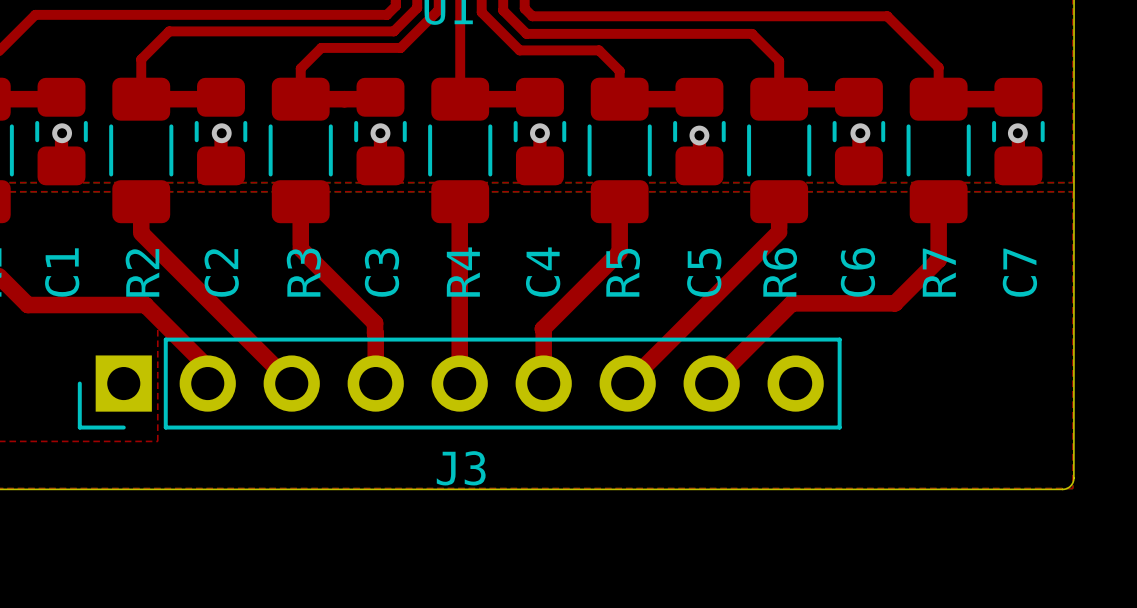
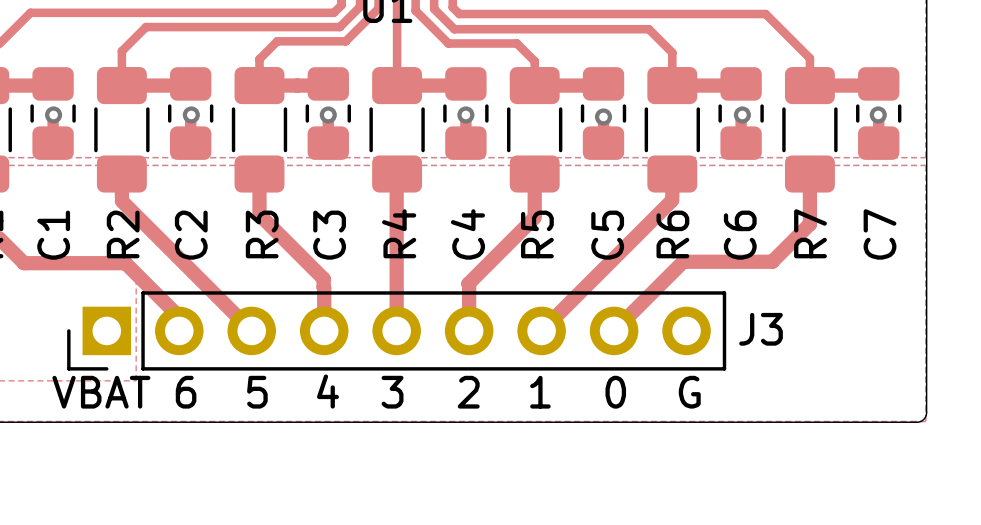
text: none -> VBAT (101, 392)
text: none -> 6 (186, 392)
text: none -> 5 (257, 392)
text: none -> 4 (327, 391)
text: none -> 3 (392, 392)
text: none -> 2 (468, 392)
text: none -> 1 (540, 392)
text: none -> 0 (615, 392)
text: none -> G (689, 392)
J3 name position: J3 (461, 468) -> J3 (761, 329)

